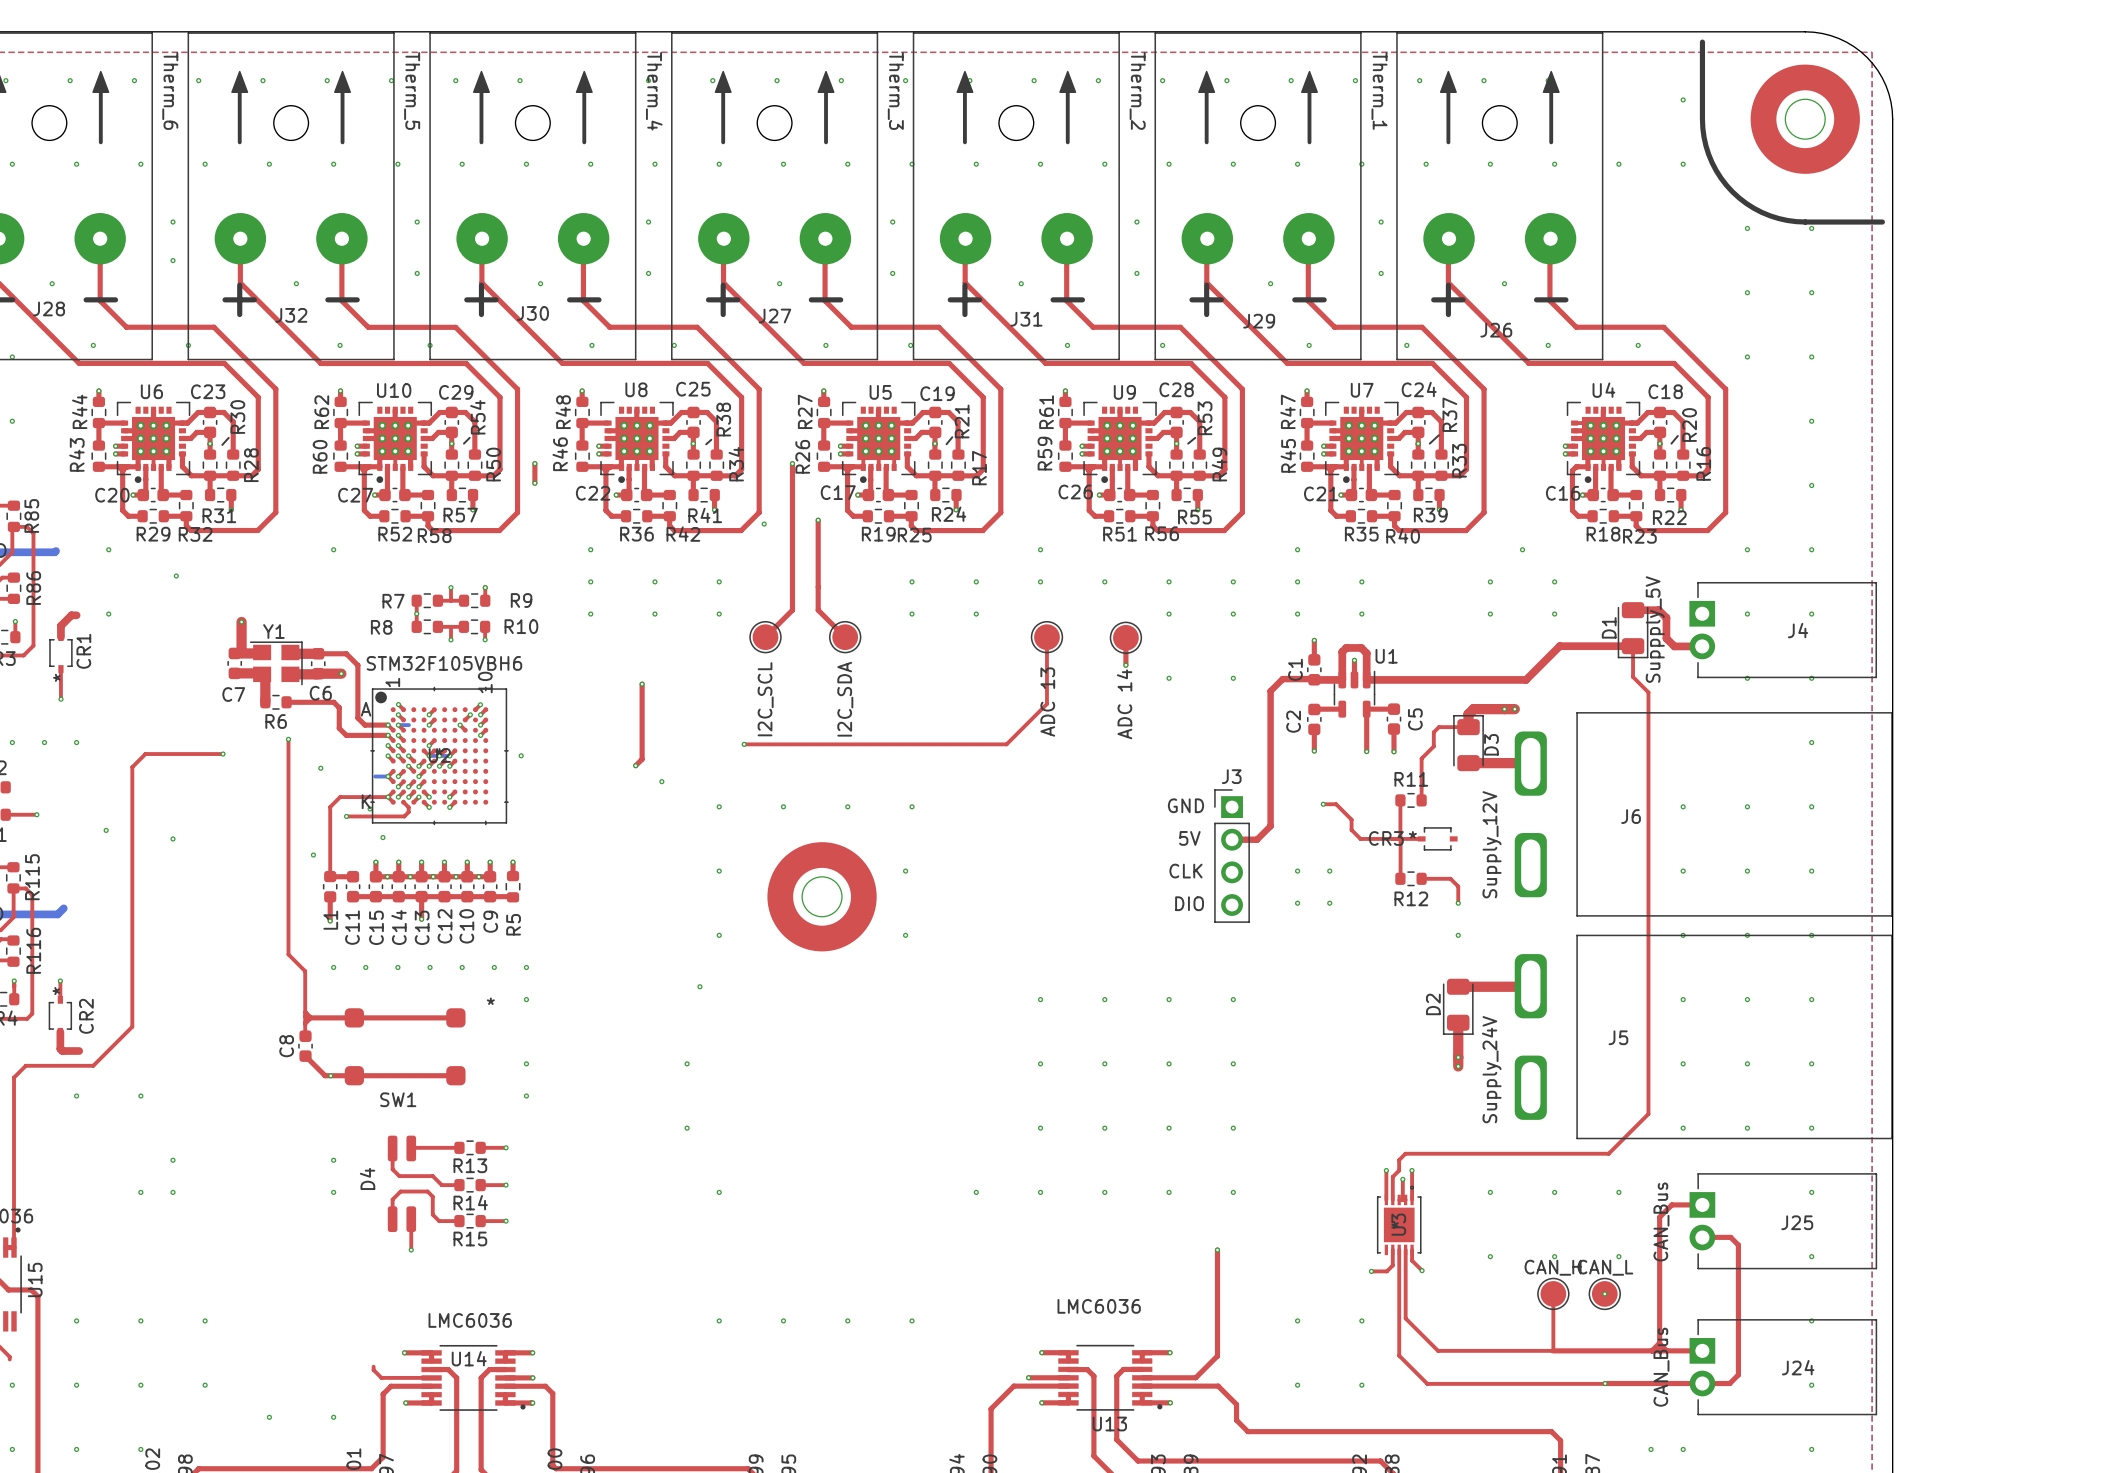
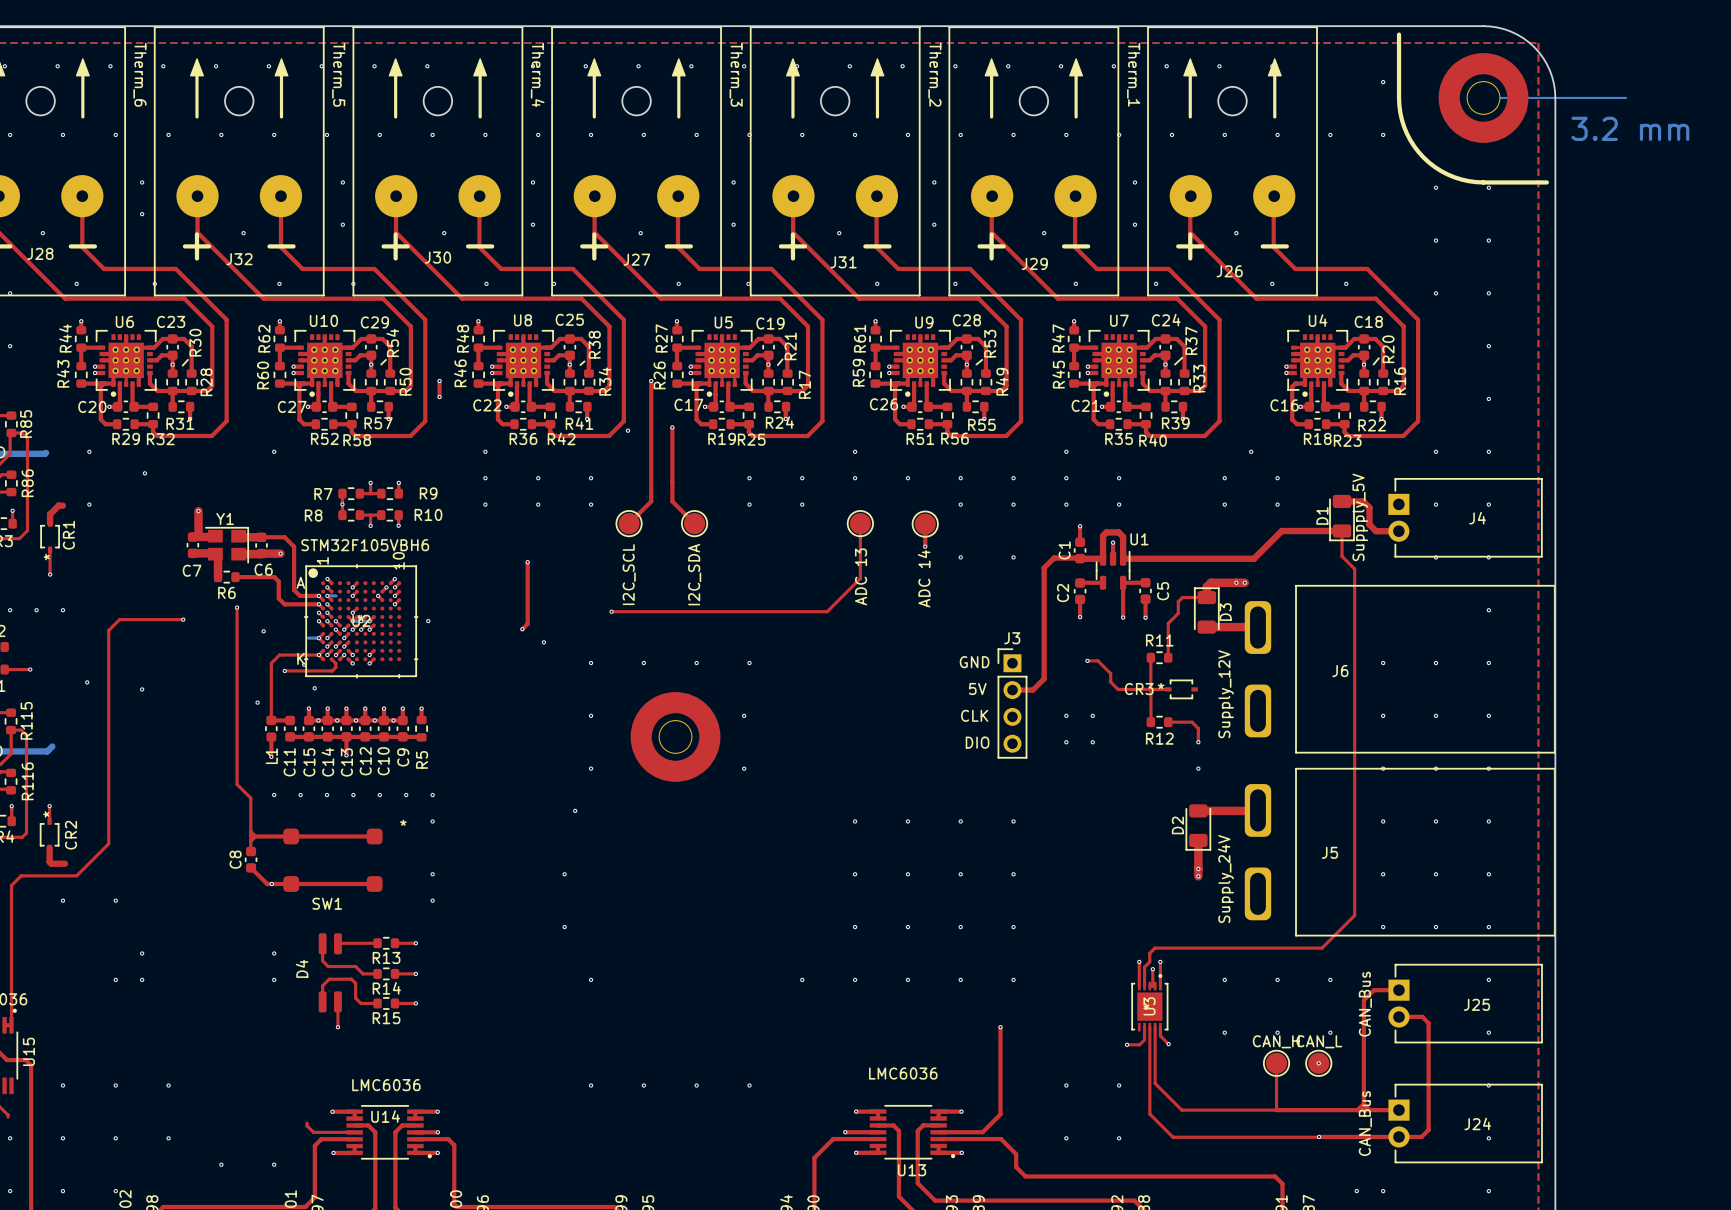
bottom track: none -> (1483, 97) (1626, 97)
text: none -> 3.2 mm (1630, 128)

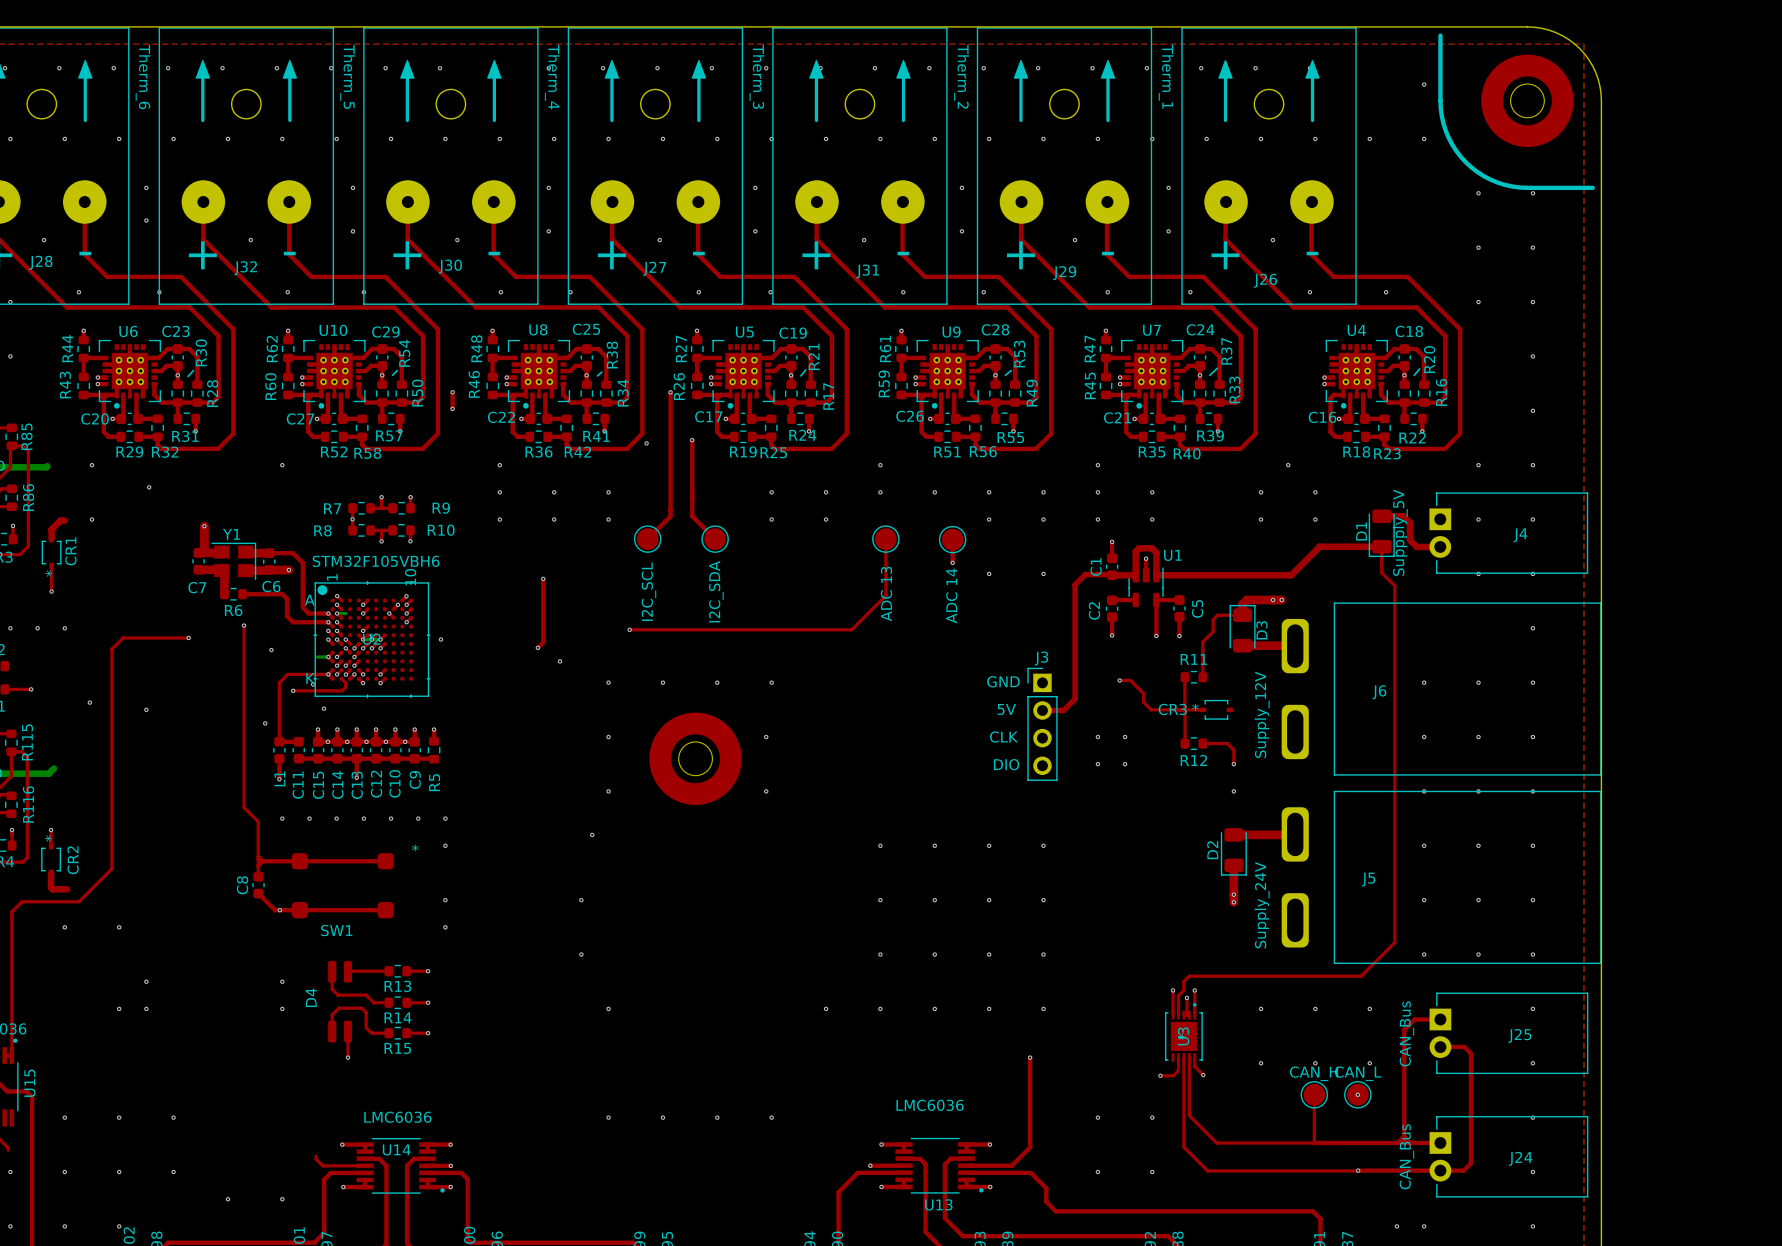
bottom track: (1483, 97) (1626, 97) -> none
text: 3.2 mm (1630, 128) -> none

